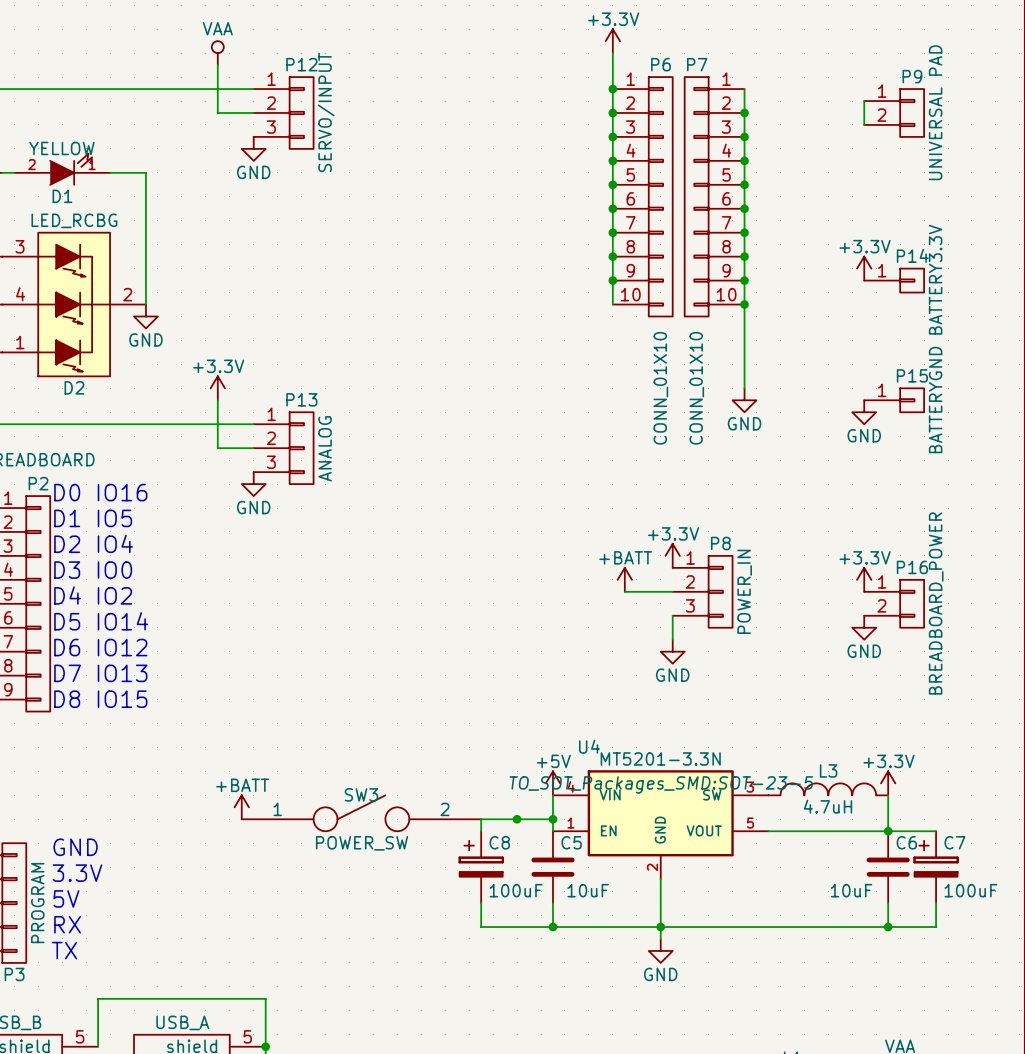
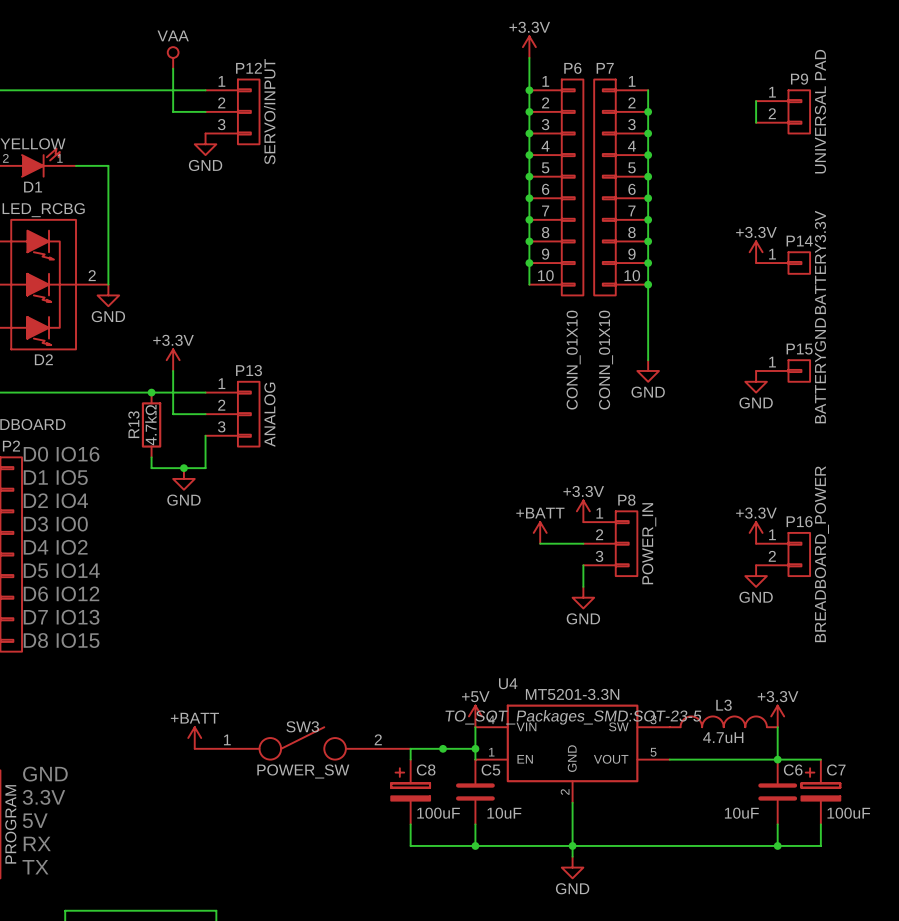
junction: none -> (151, 392)
R13: none -> 4.7kΩ (151, 424)
wire: none -> (205, 435) (205, 468) (151, 468) (151, 457)
power symbol position: GND (253, 484) -> GND (183, 478)
junction: none -> (183, 468)

